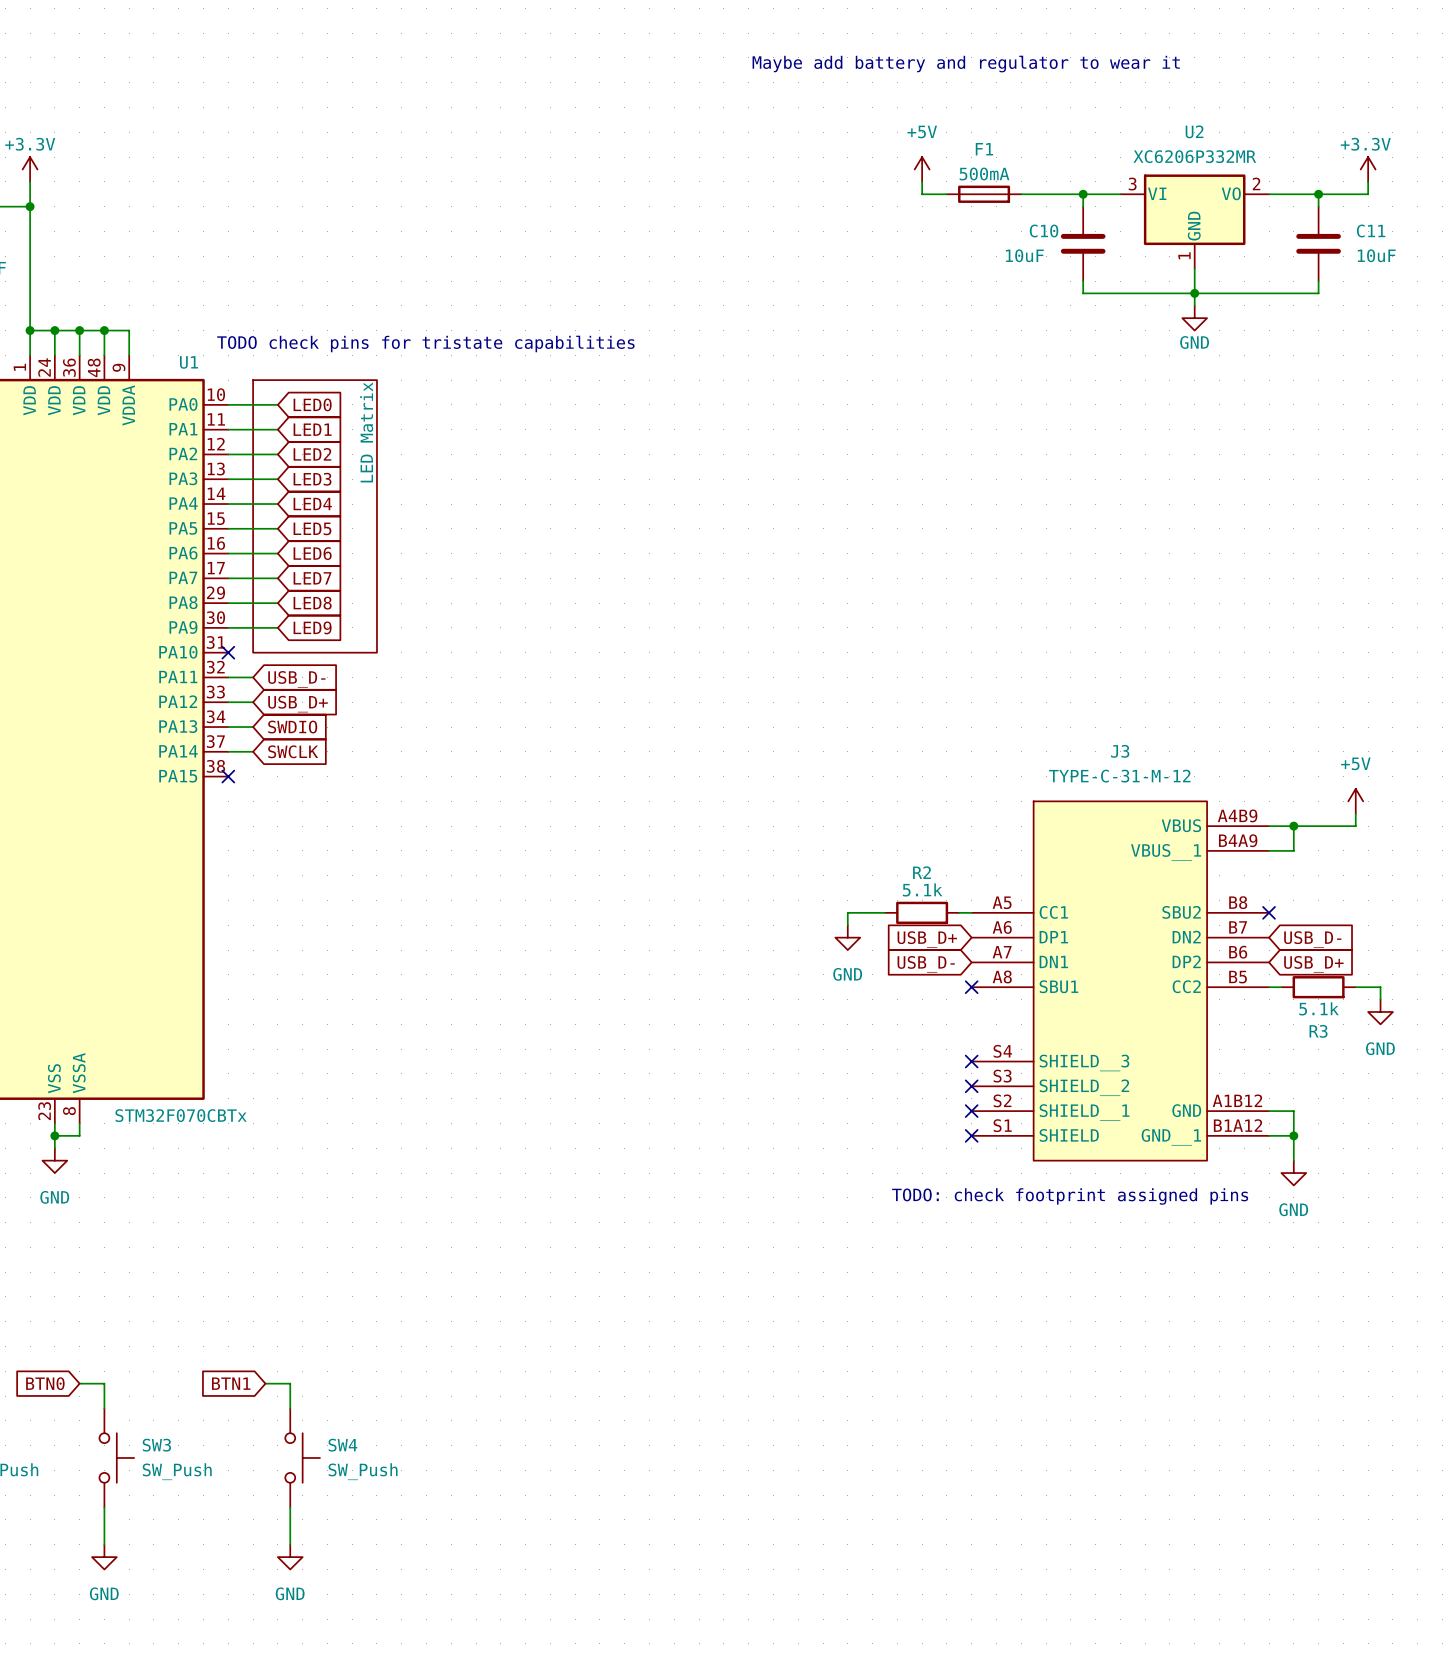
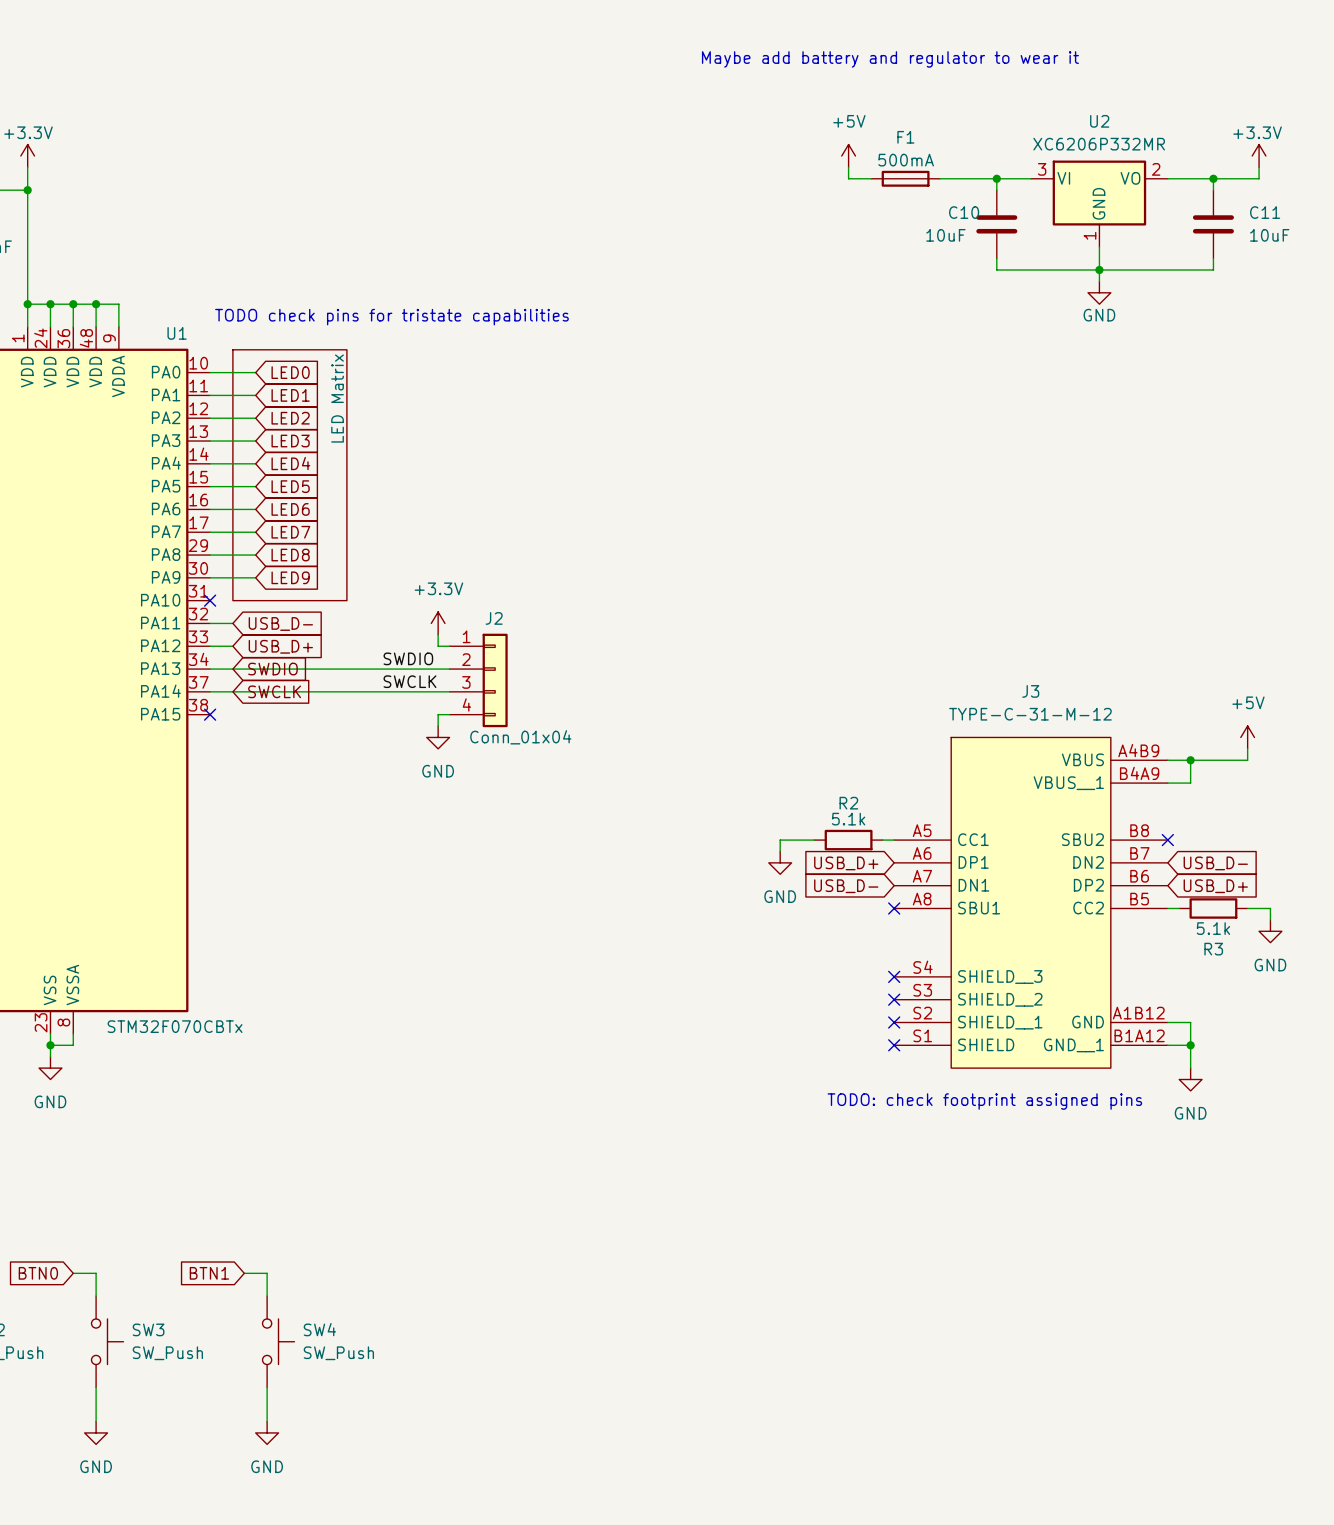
power symbol: none -> +3.3V (438, 623)
wire: none -> (438, 634) (438, 646) (449, 646)
label: none -> SWDIO (408, 658)
wire: none -> (232, 669) (449, 669)
J2: none -> Conn_01x04 (478, 680)
label: none -> SWCLK (409, 681)
wire: none -> (232, 691) (449, 691)
wire: none -> (449, 714) (438, 714) (438, 726)
power symbol: none -> GND (438, 737)

